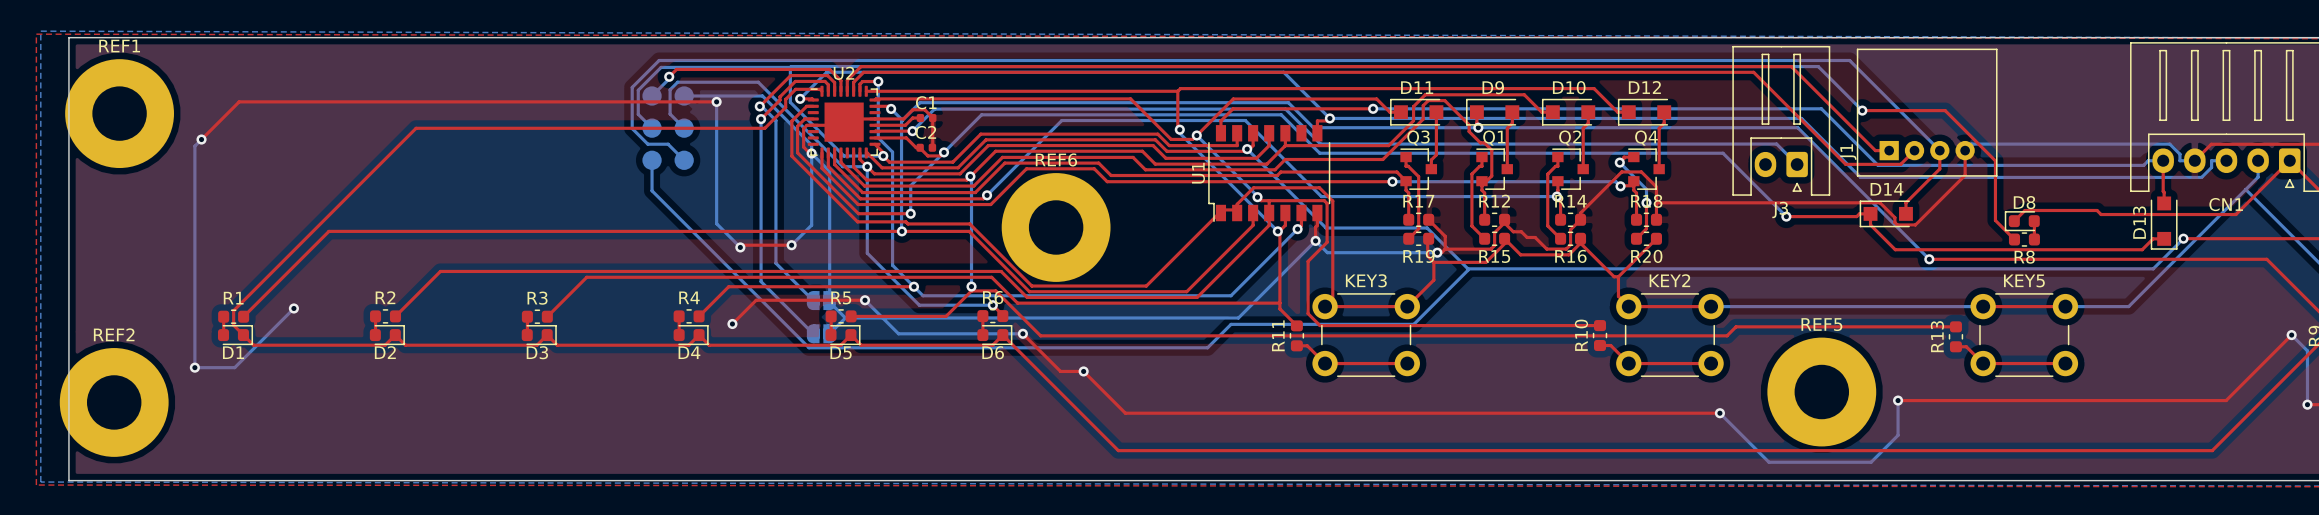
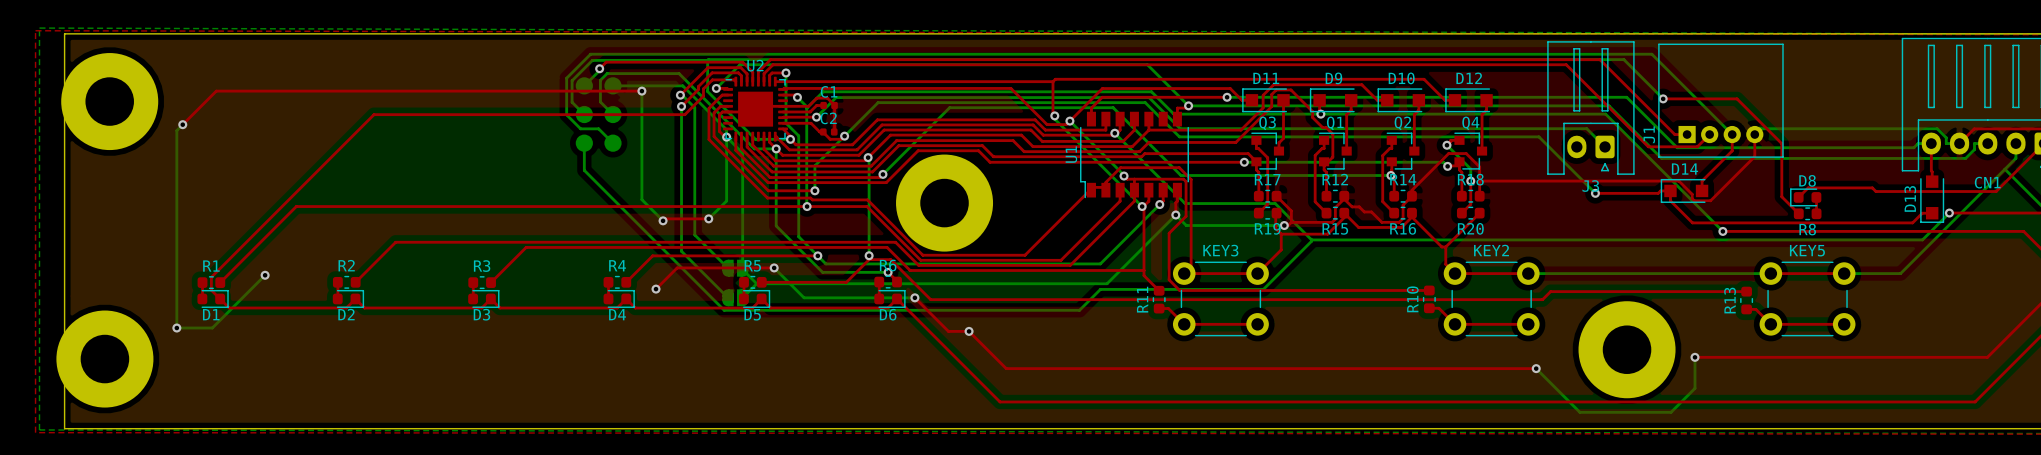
REF1 name: REF1 (119, 46) -> none
REF6 name: REF6 (1056, 159) -> none
REF5 name: REF5 (1821, 324) -> none
REF2 name: REF2 (114, 334) -> none

